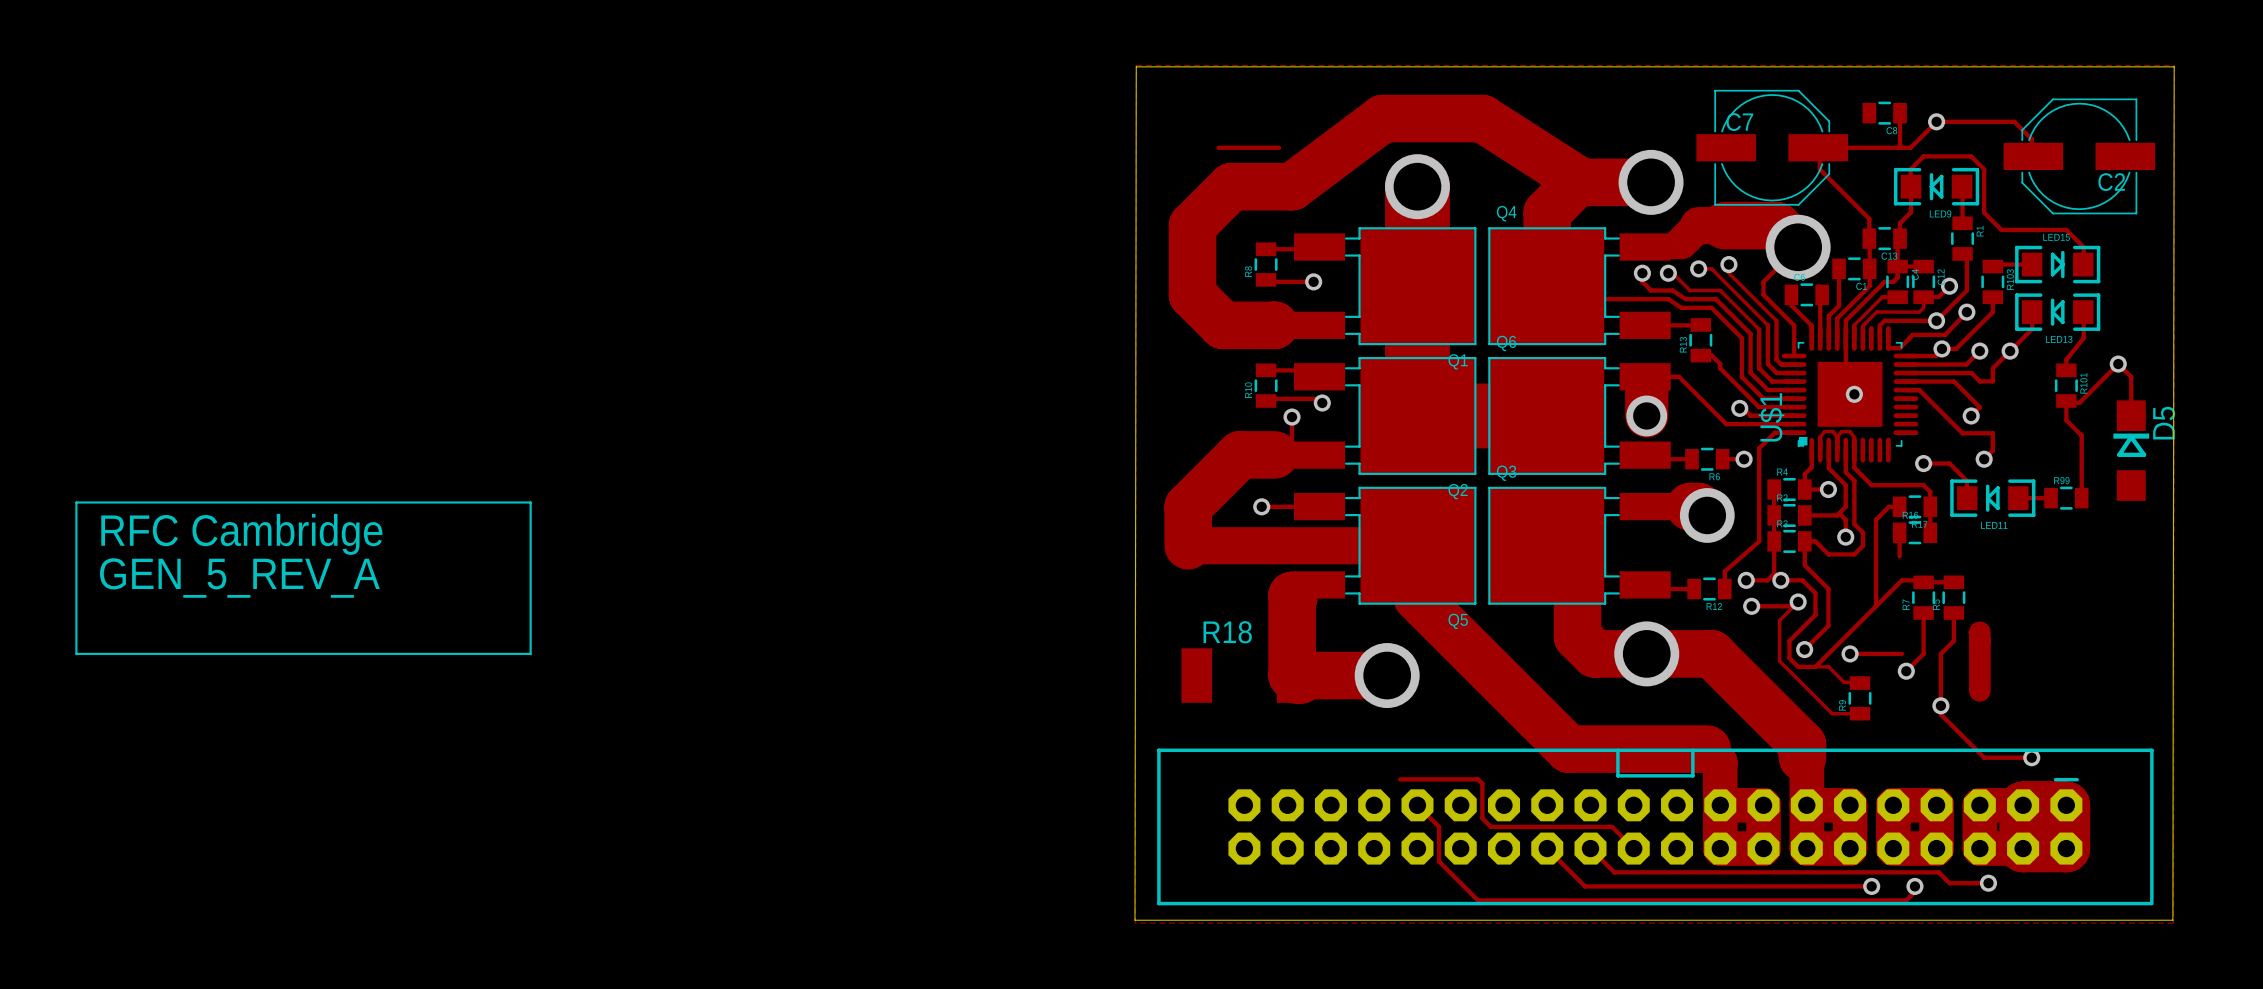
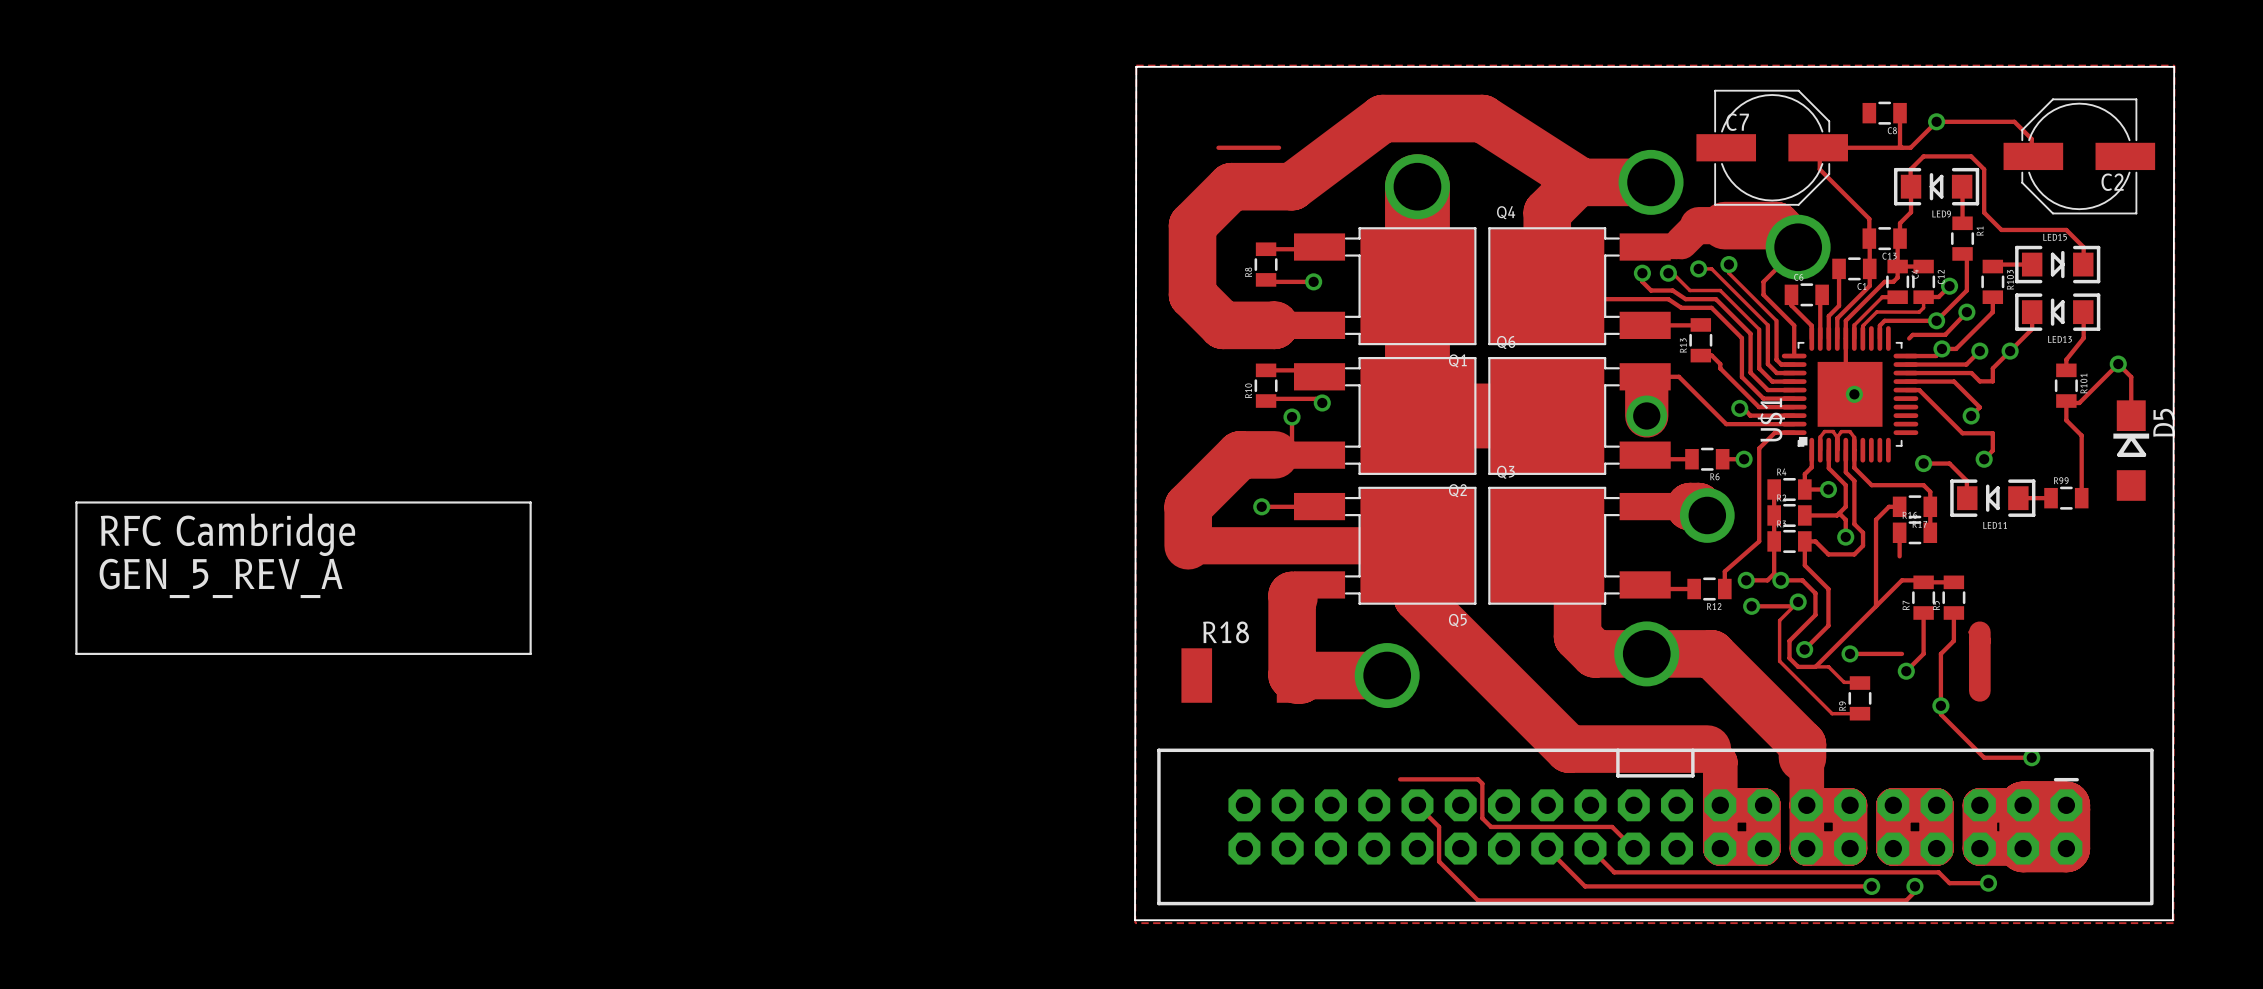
track: (1909, 338) (1899, 348) (1888, 347) -> none

